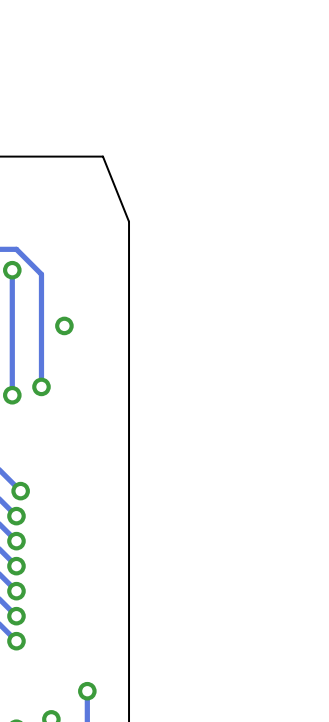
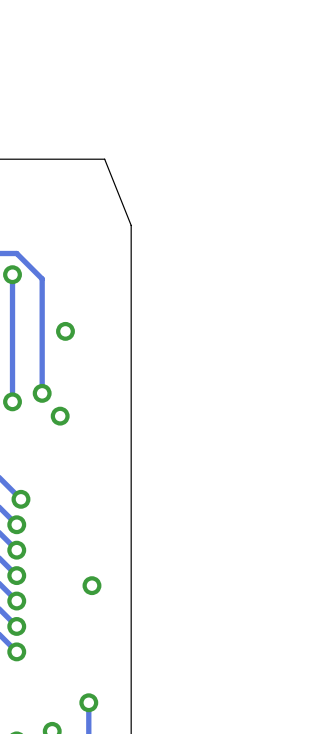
via: none -> (60, 416)
via: none -> (91, 585)

